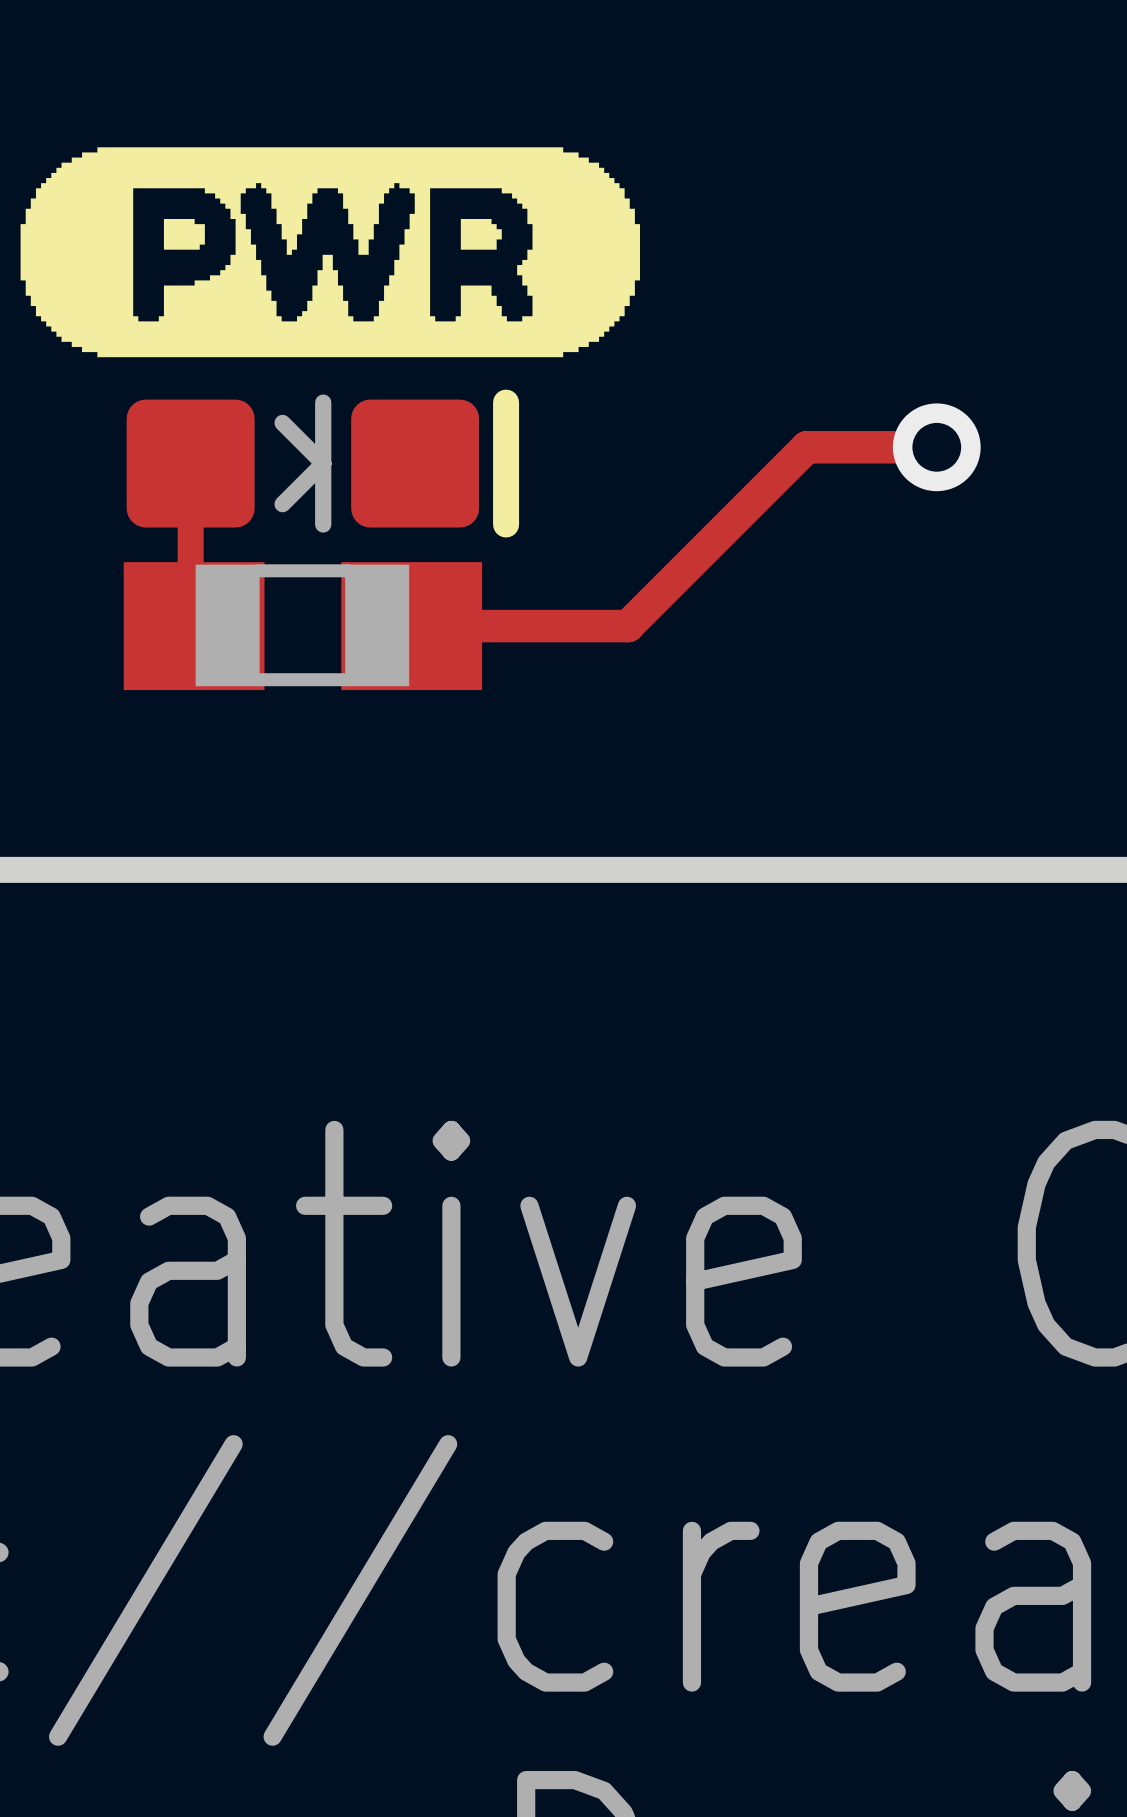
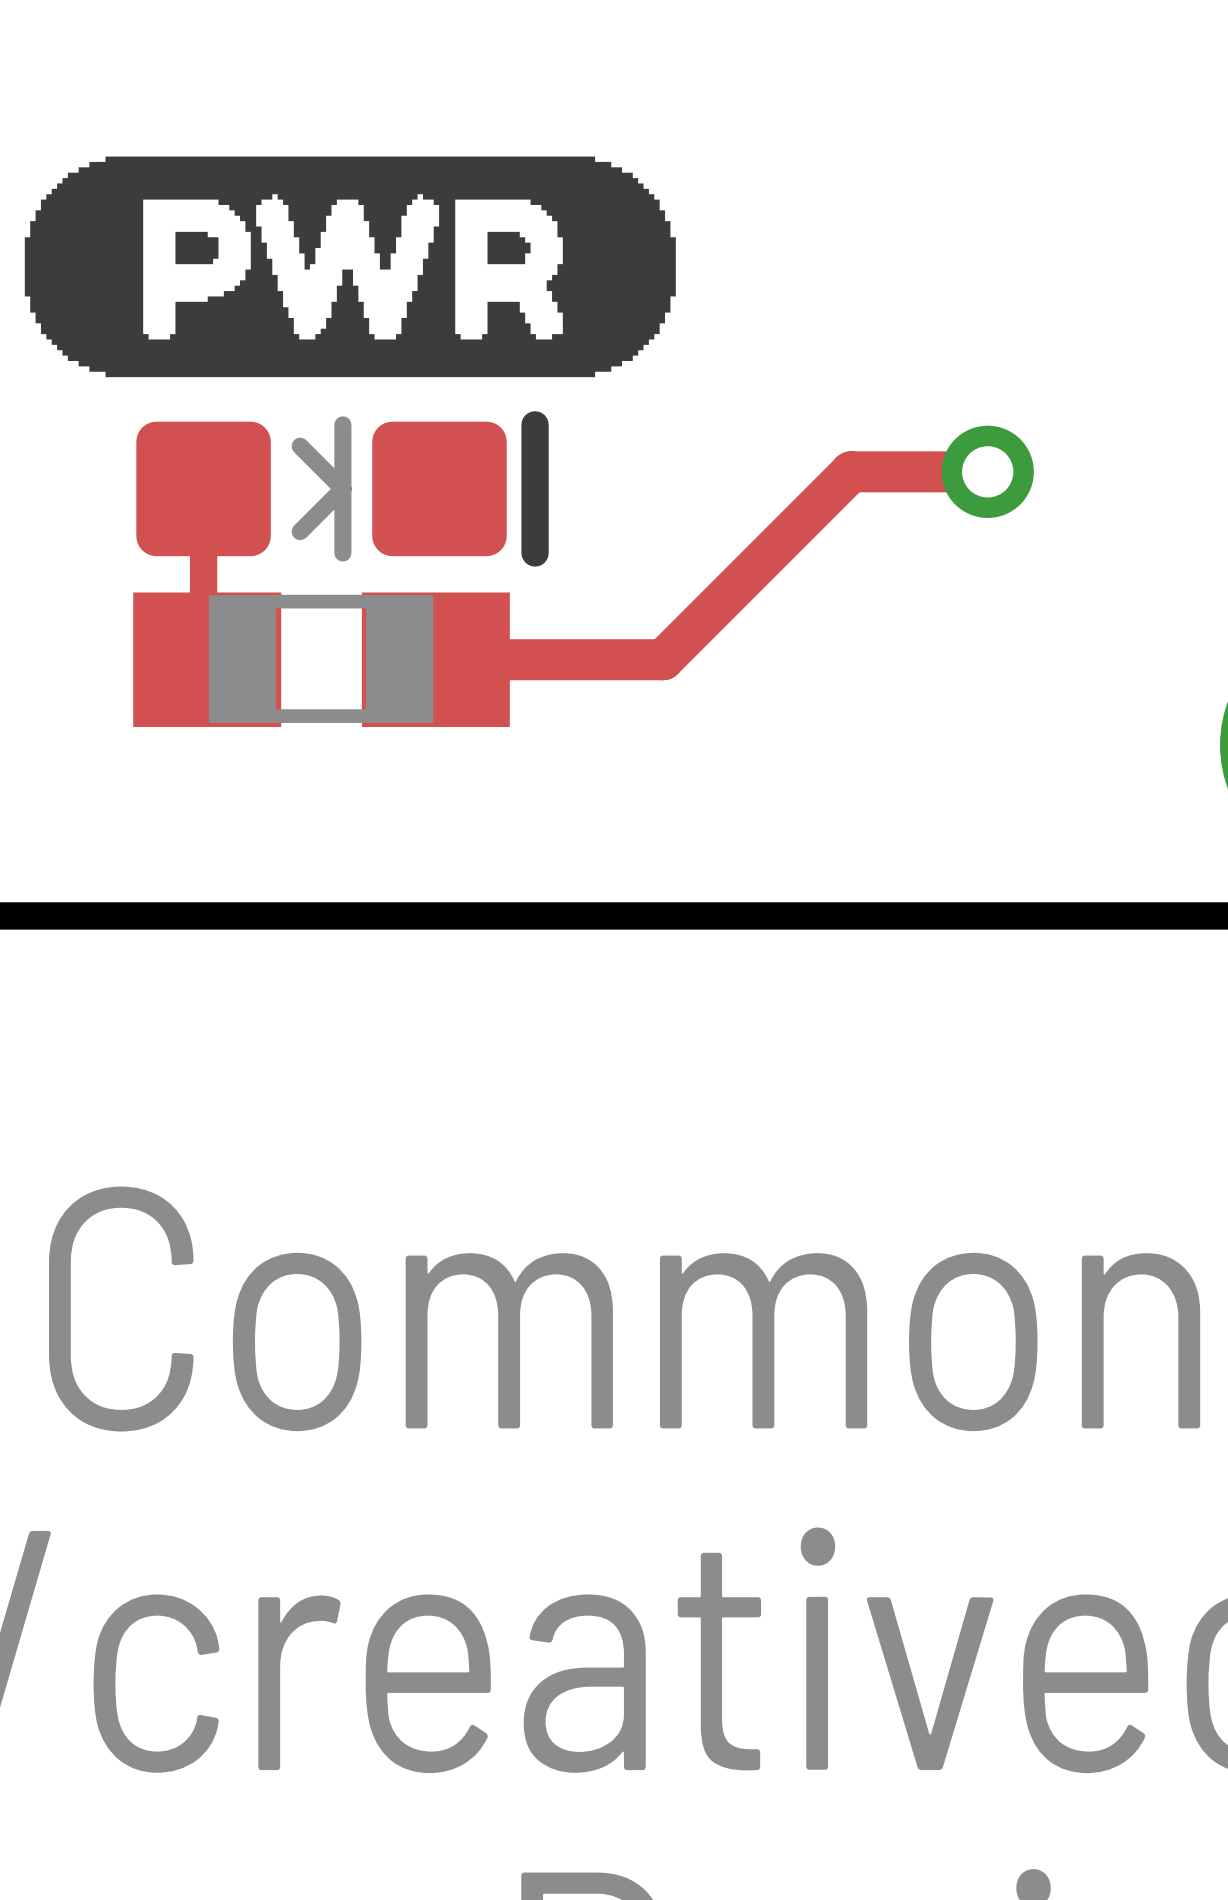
track width: thin (936, 447) (806, 447) (627, 626) (411, 626) -> thick (987, 471) (851, 471) (663, 659) (435, 659)

